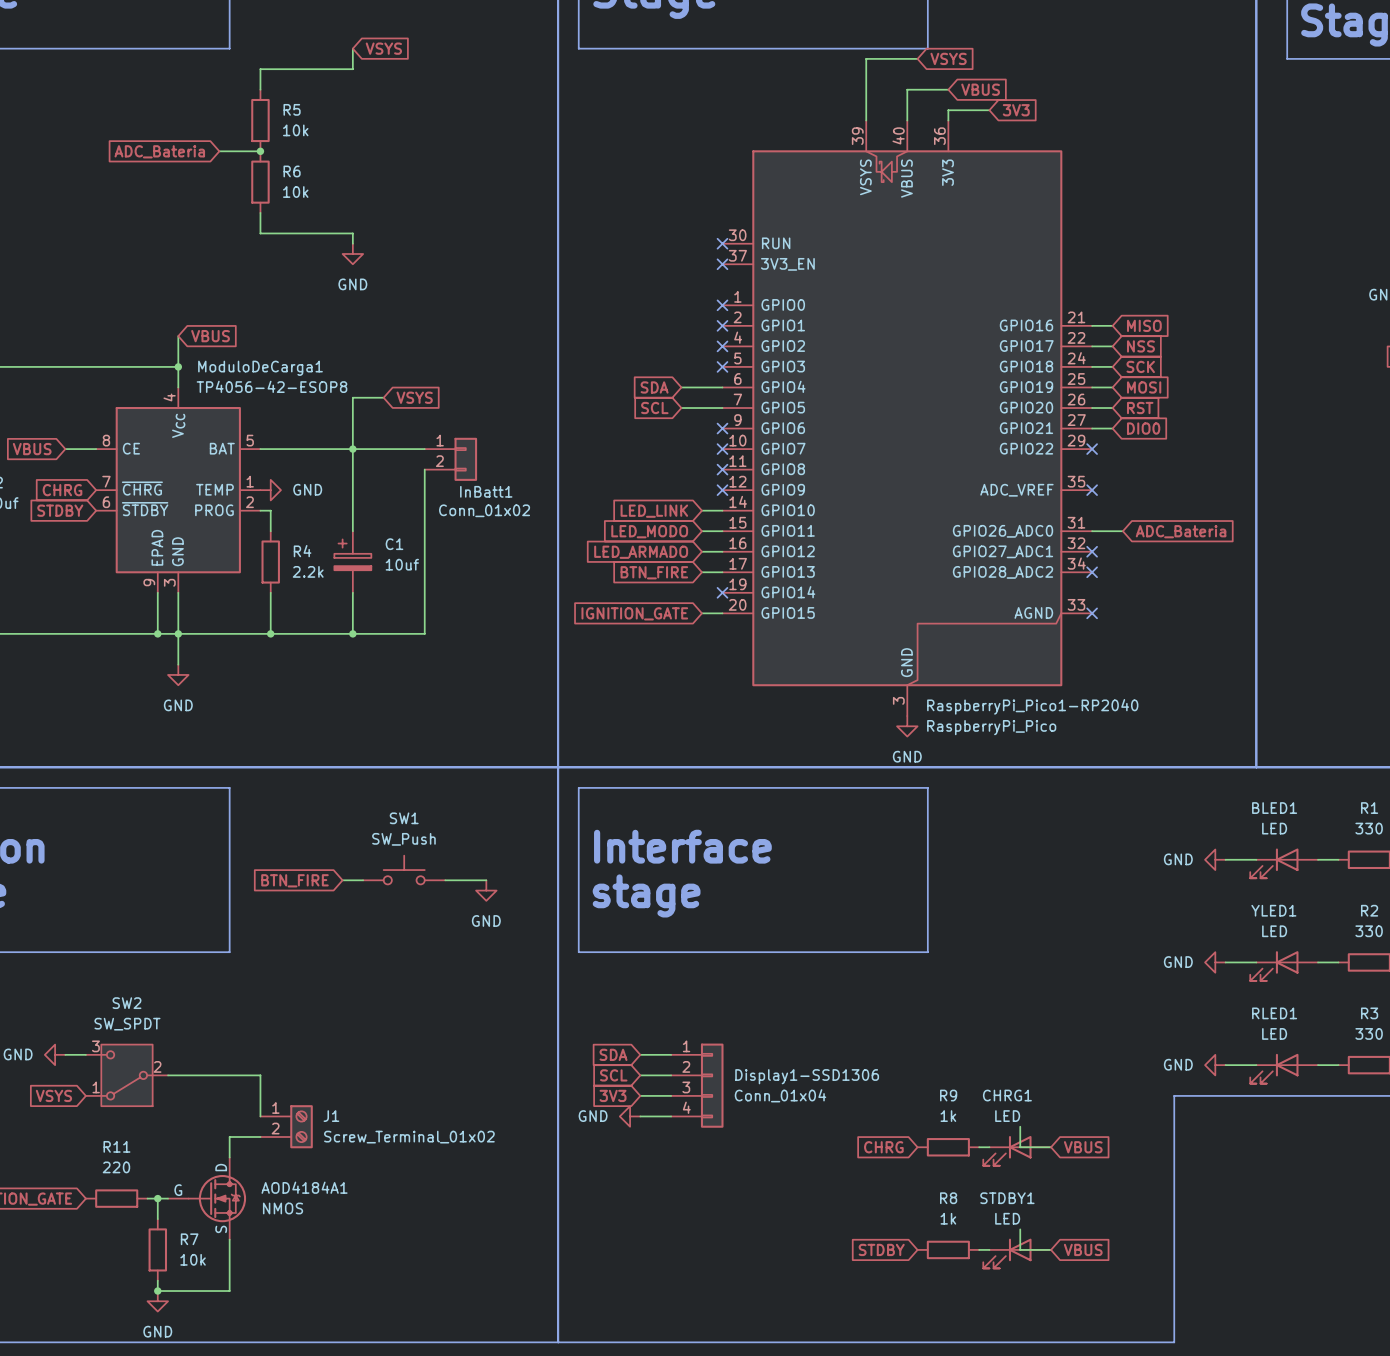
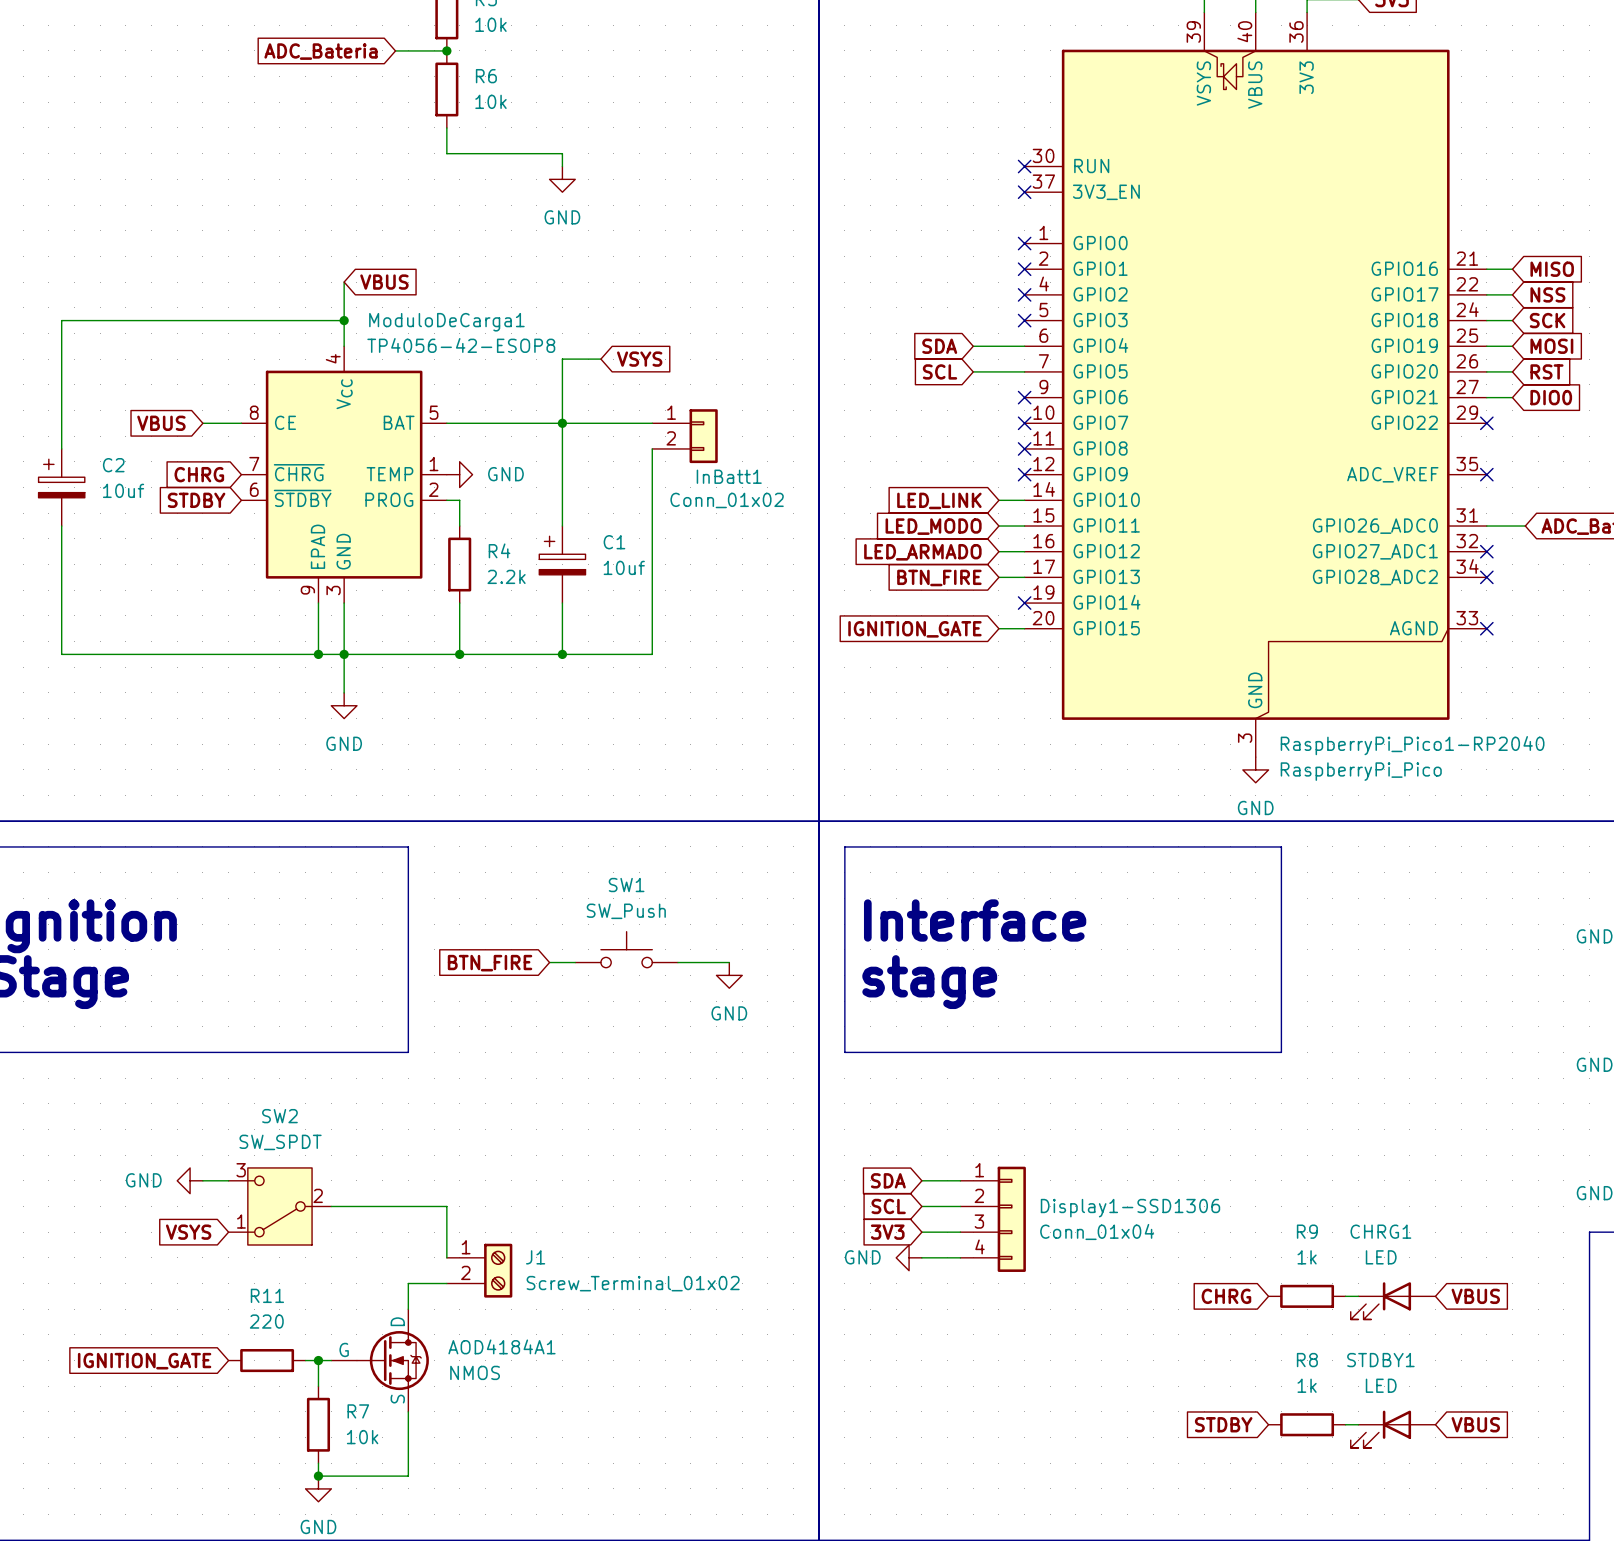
wire: (1020, 1126) (1020, 1147) (1051, 1147) -> none
wire: (1020, 1229) (1020, 1249) (1051, 1249) -> none

